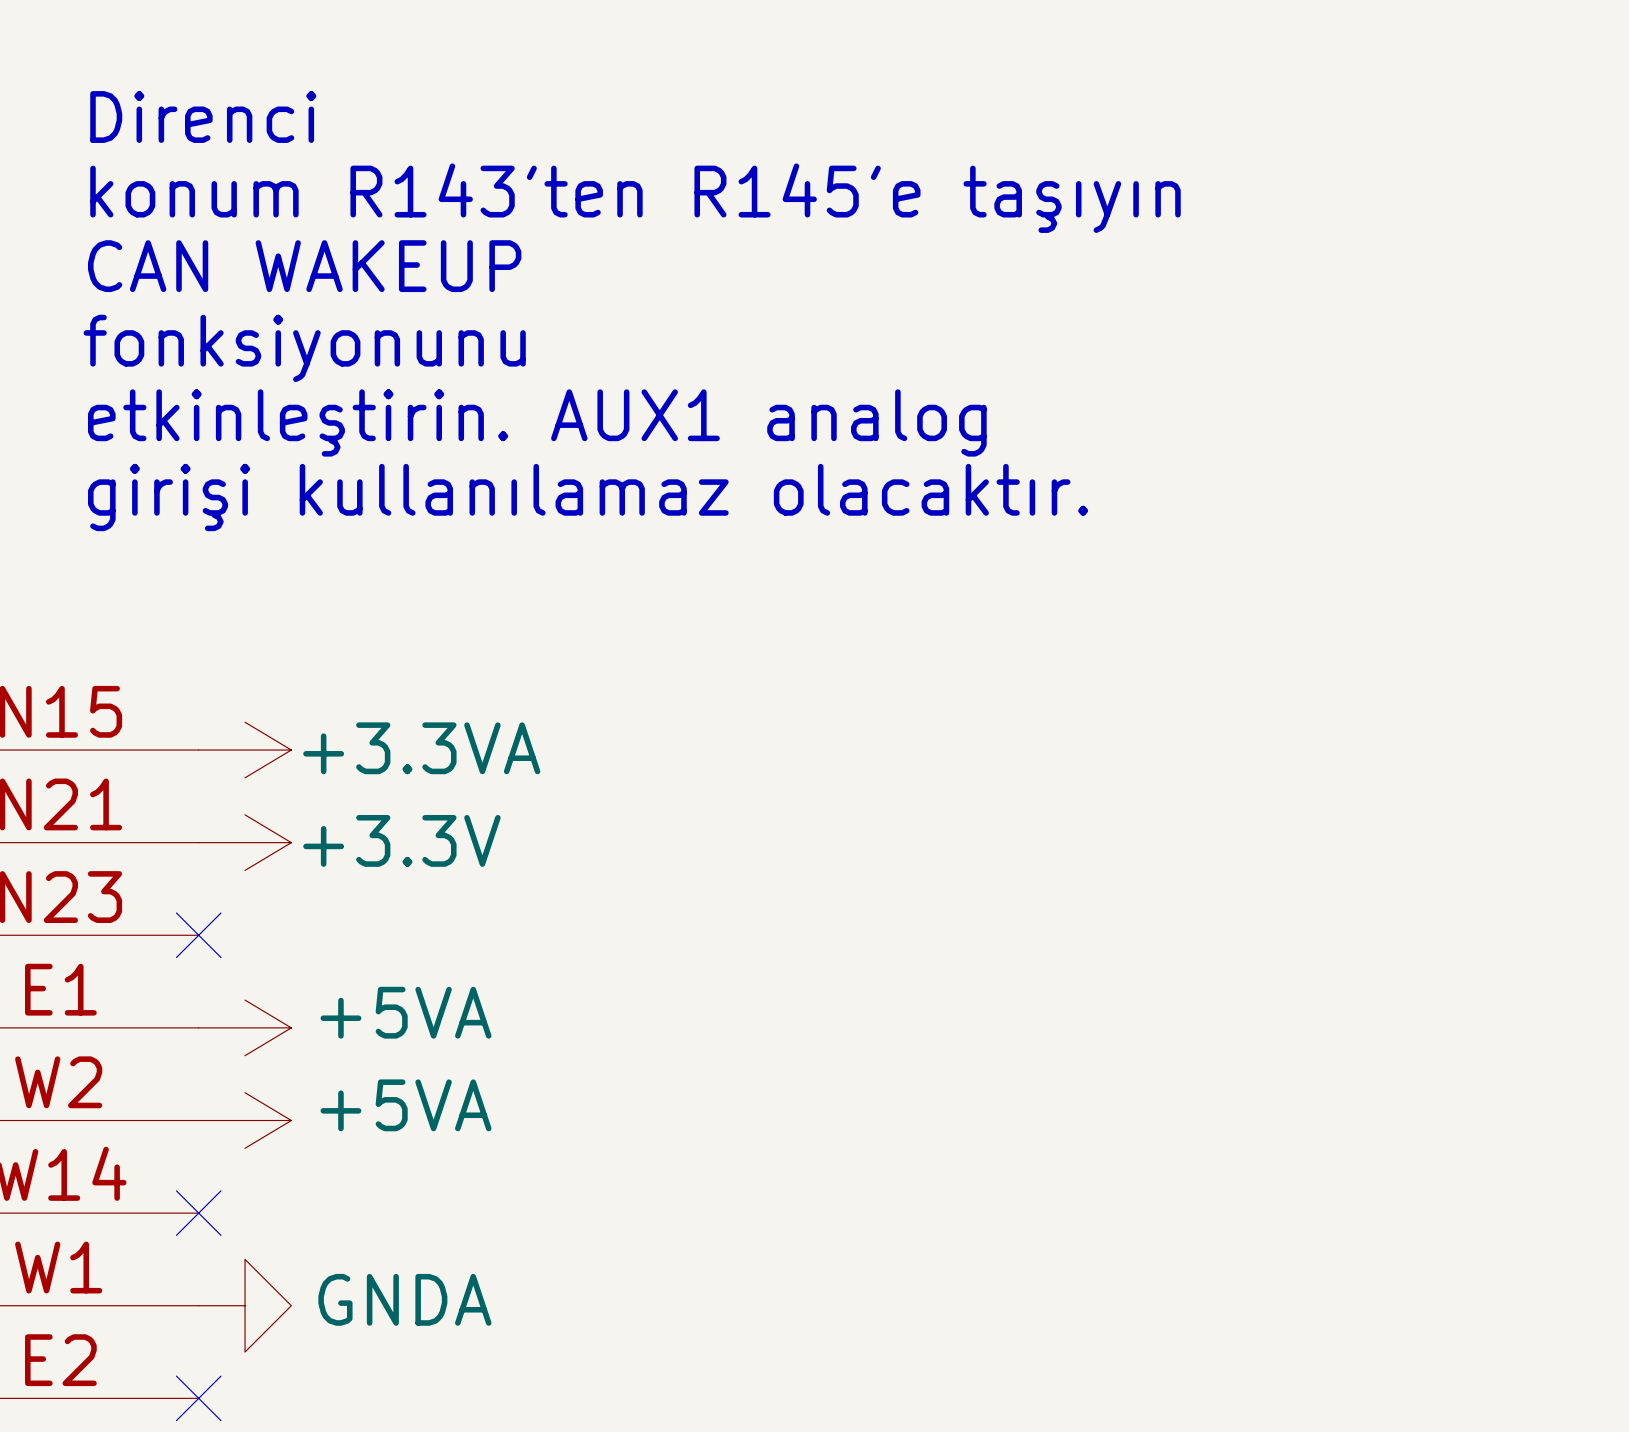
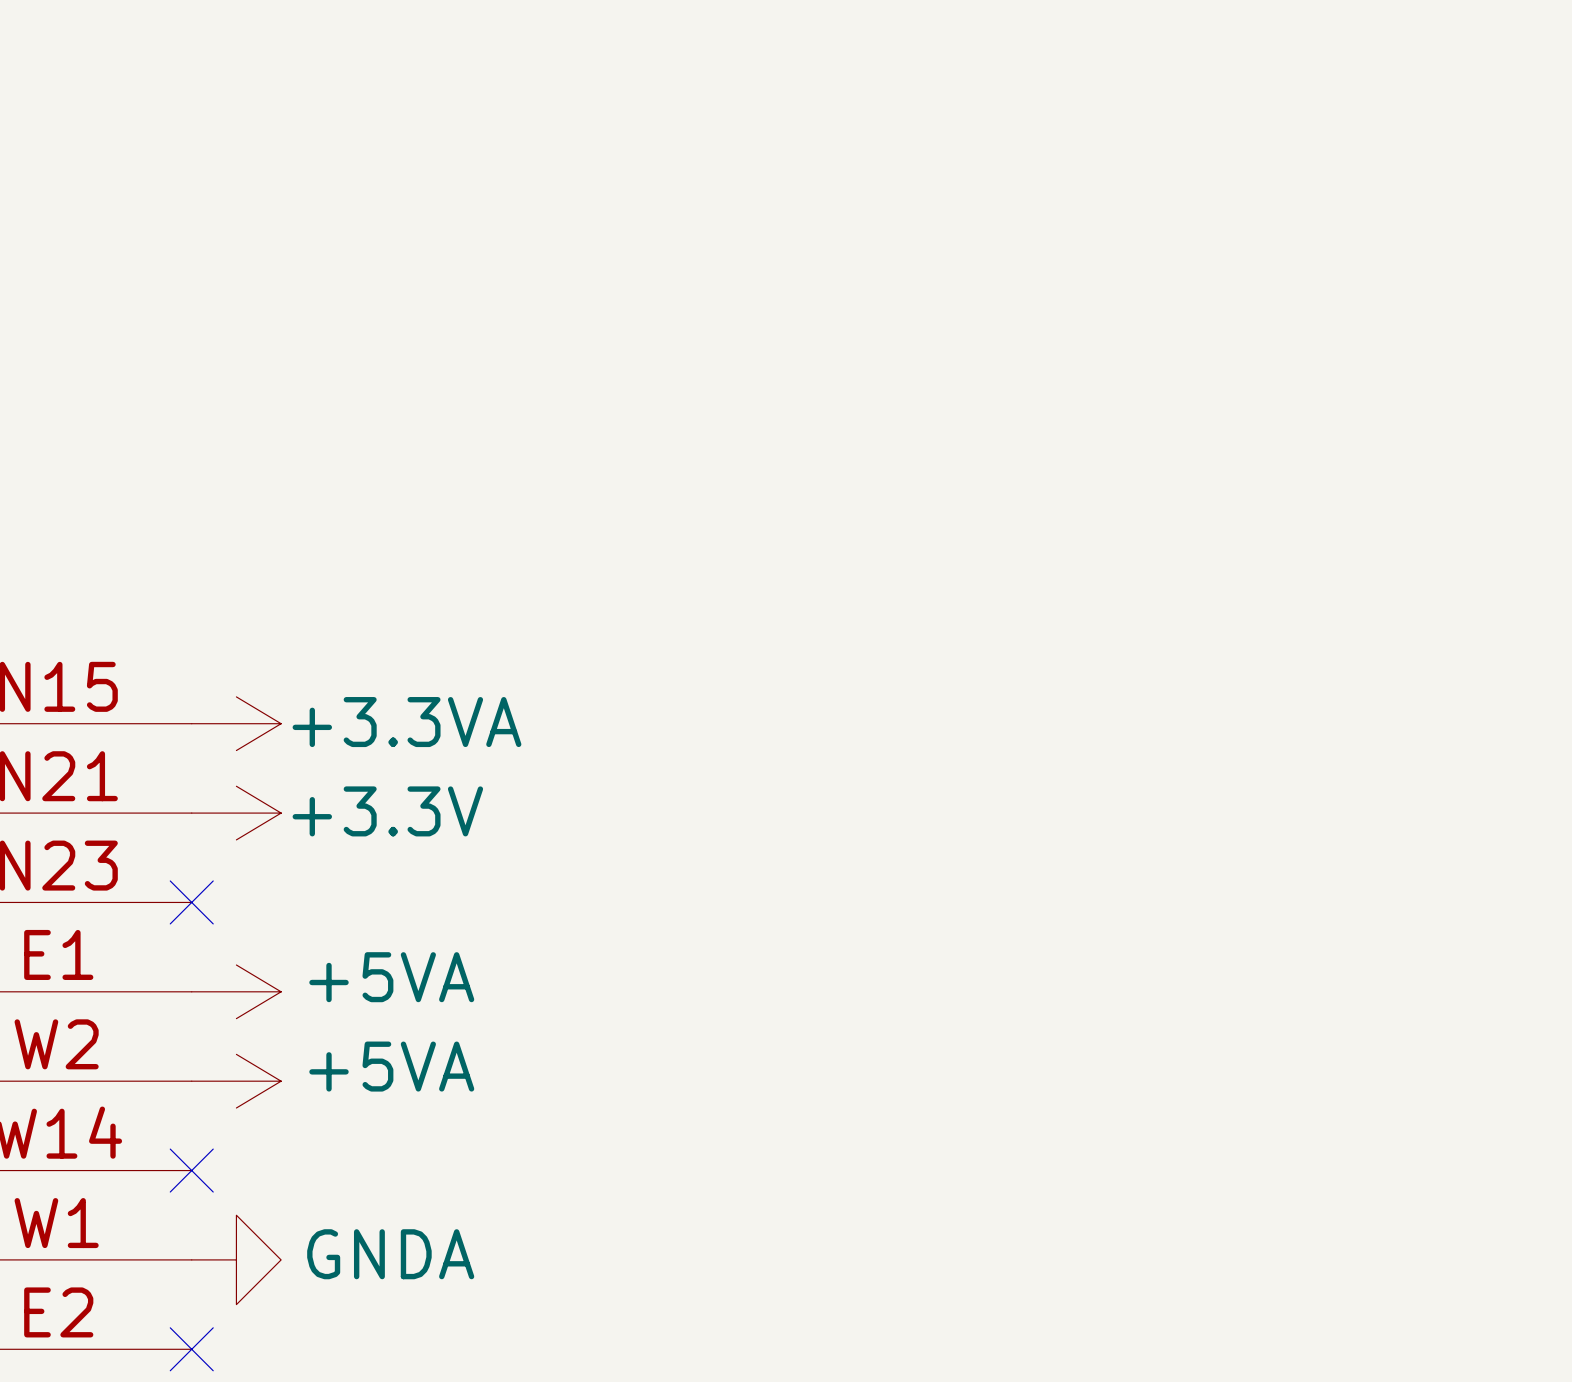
text: Direnci (203, 117) -> none
text: konum R143'ten R145'e taşıyın (635, 198) -> none
text: CAN WAKEUP (304, 266) -> none
text: fonksiyonunu (304, 348) -> none
text: etkinleştirin. AUX1 analog (537, 422) -> none
text: girişi kullanılamaz olacaktır. (588, 497) -> none

